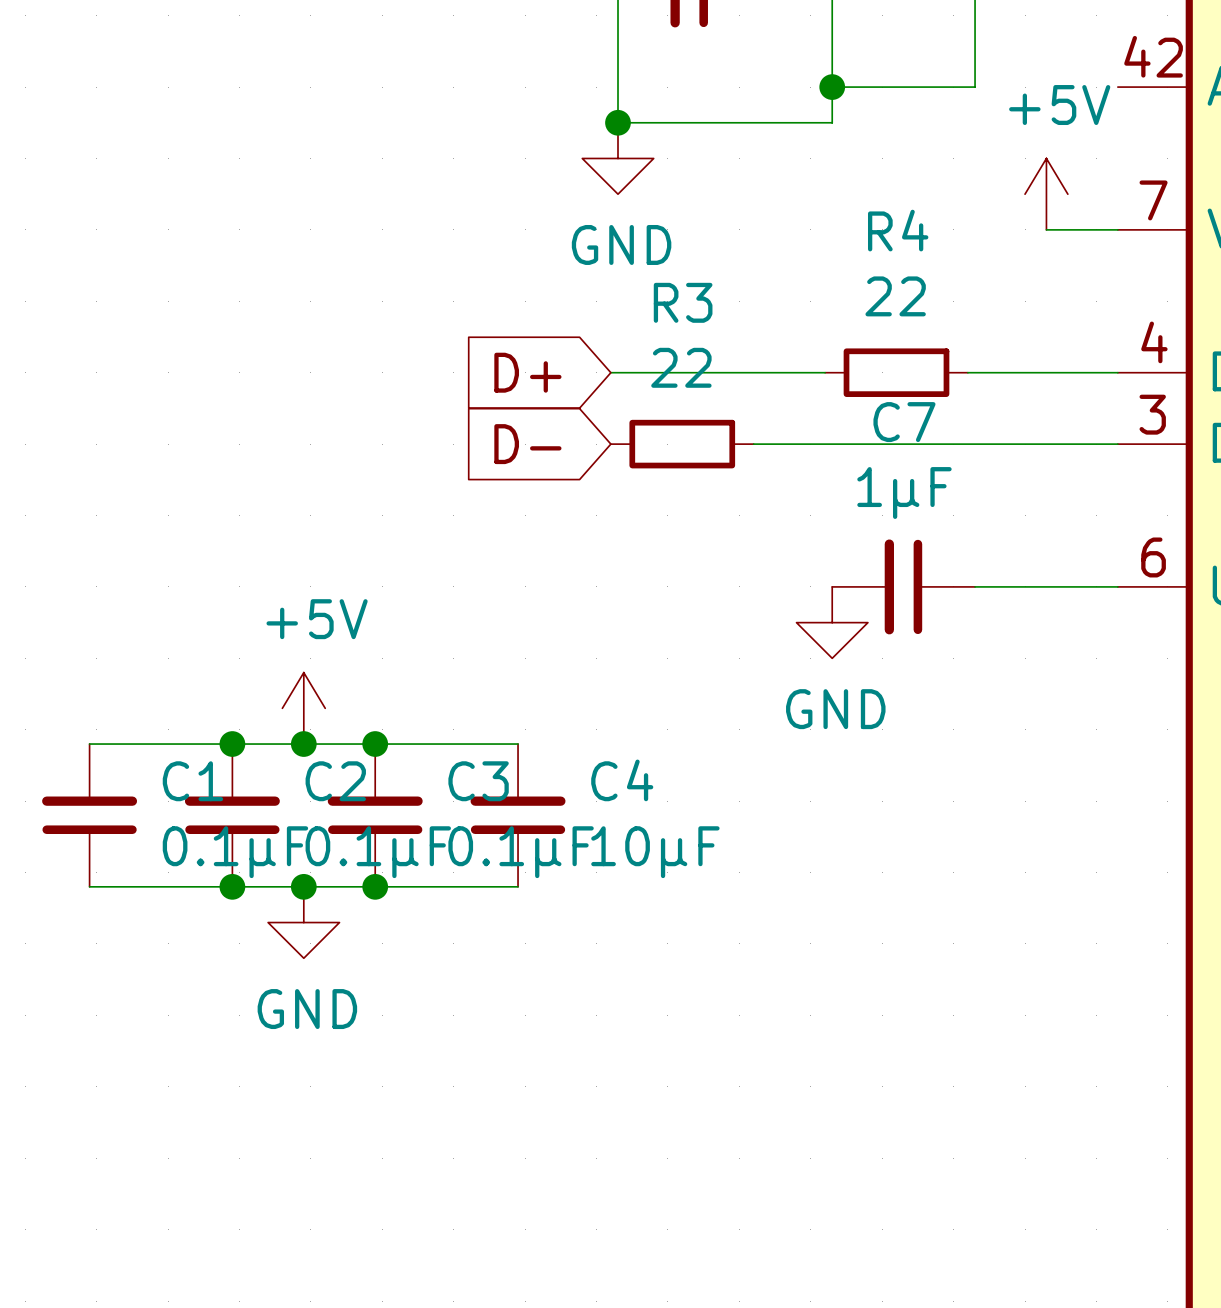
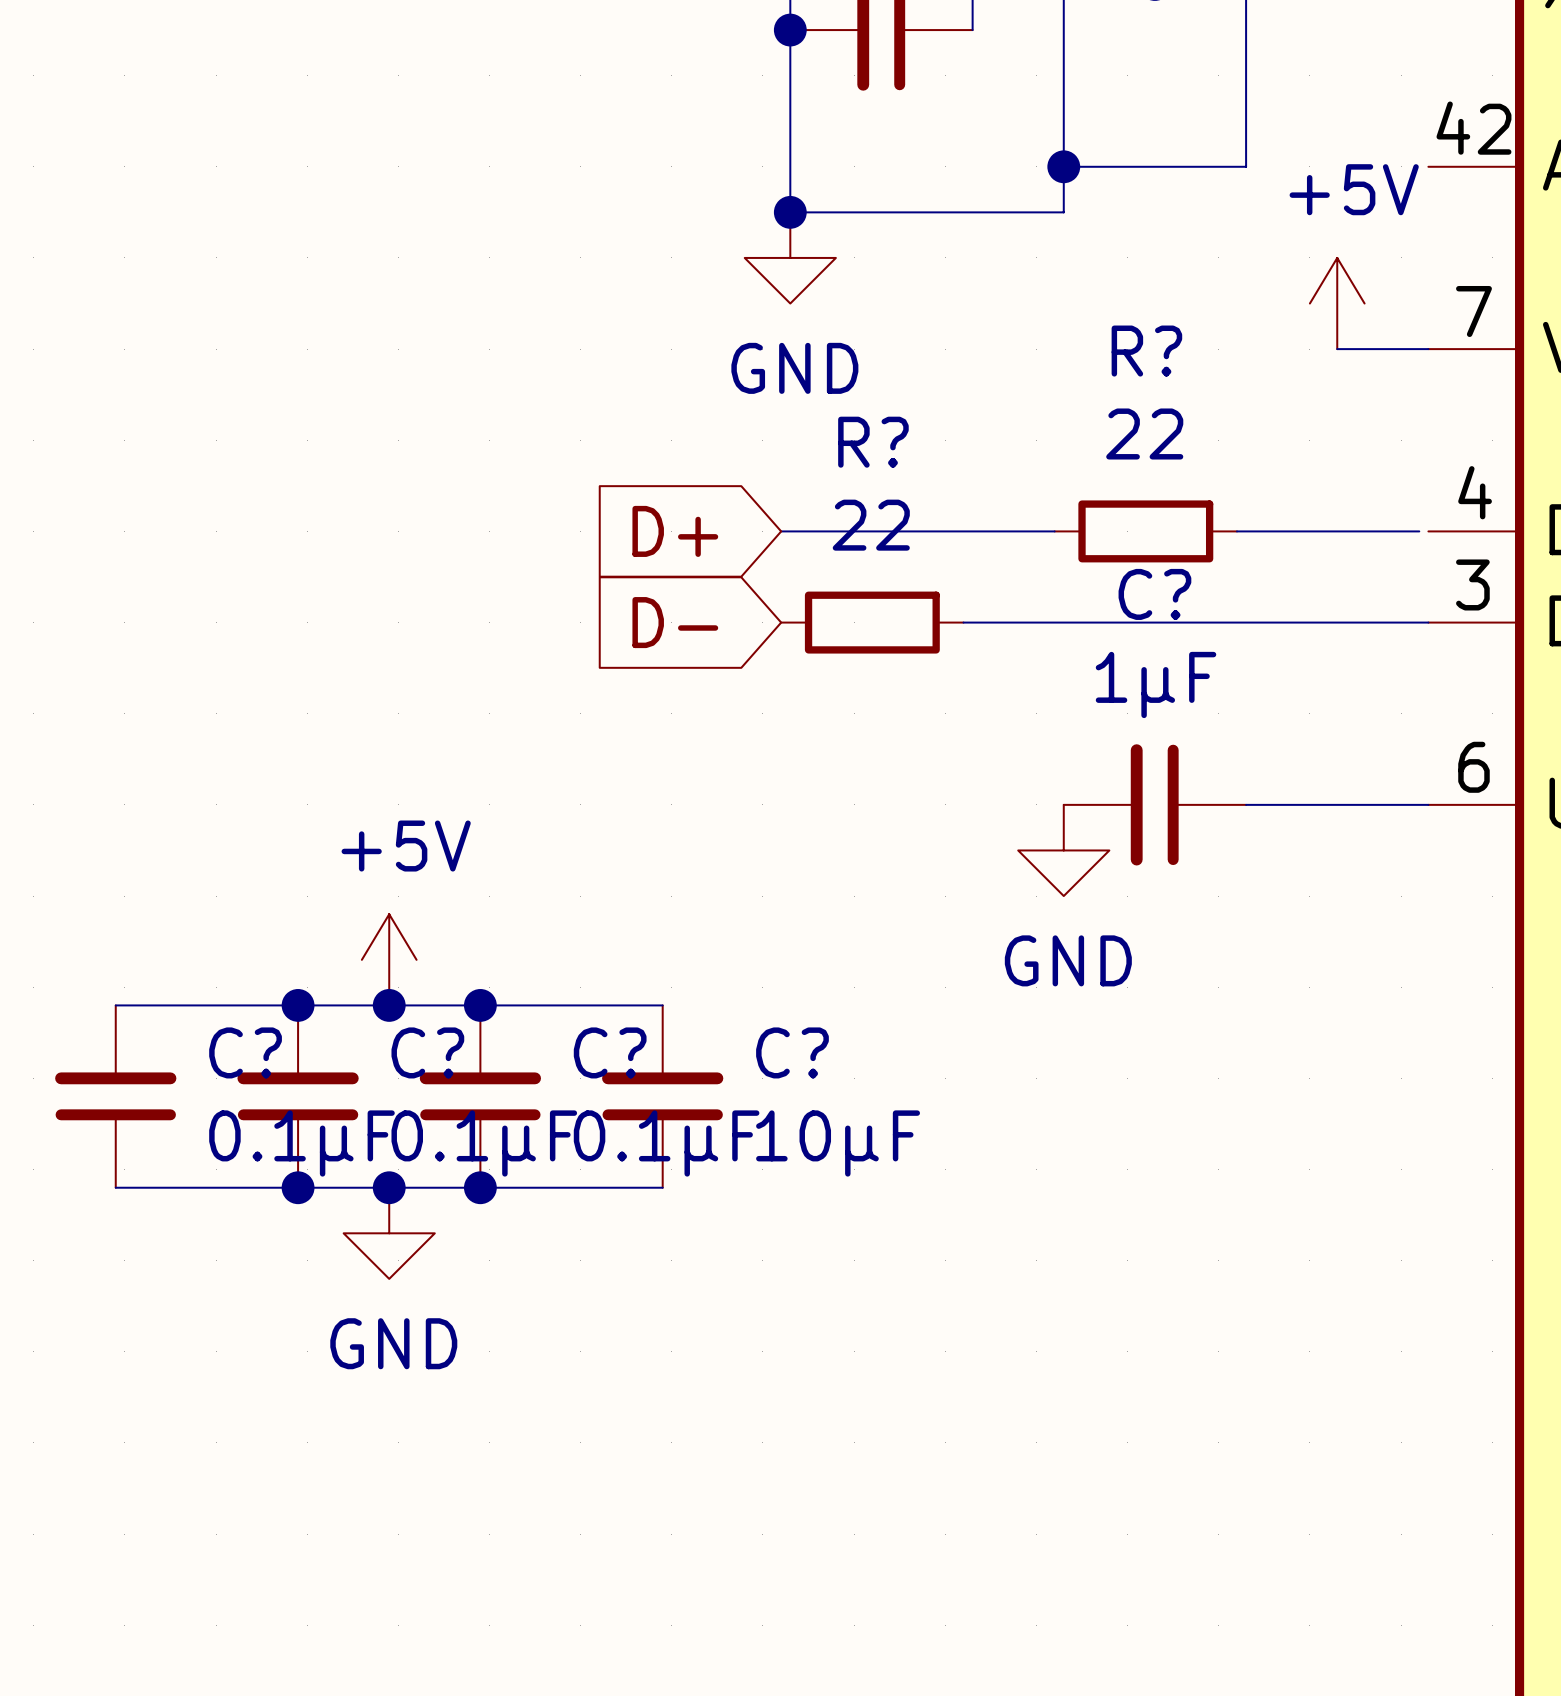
R4 name: R4 (898, 230) -> R? (1146, 351)
R3 name: R3 (683, 302) -> R? (873, 442)
wire: (1110, 372) (1117, 372) -> none
C7 name: C7 (904, 422) -> C? (1154, 594)
C4 name: C4 (622, 780) -> C? (792, 1052)
C1 name: C1 (192, 781) -> C? (245, 1052)
C2 name: C2 (335, 781) -> C? (427, 1052)
C3 name: C3 (478, 781) -> C? (610, 1052)

